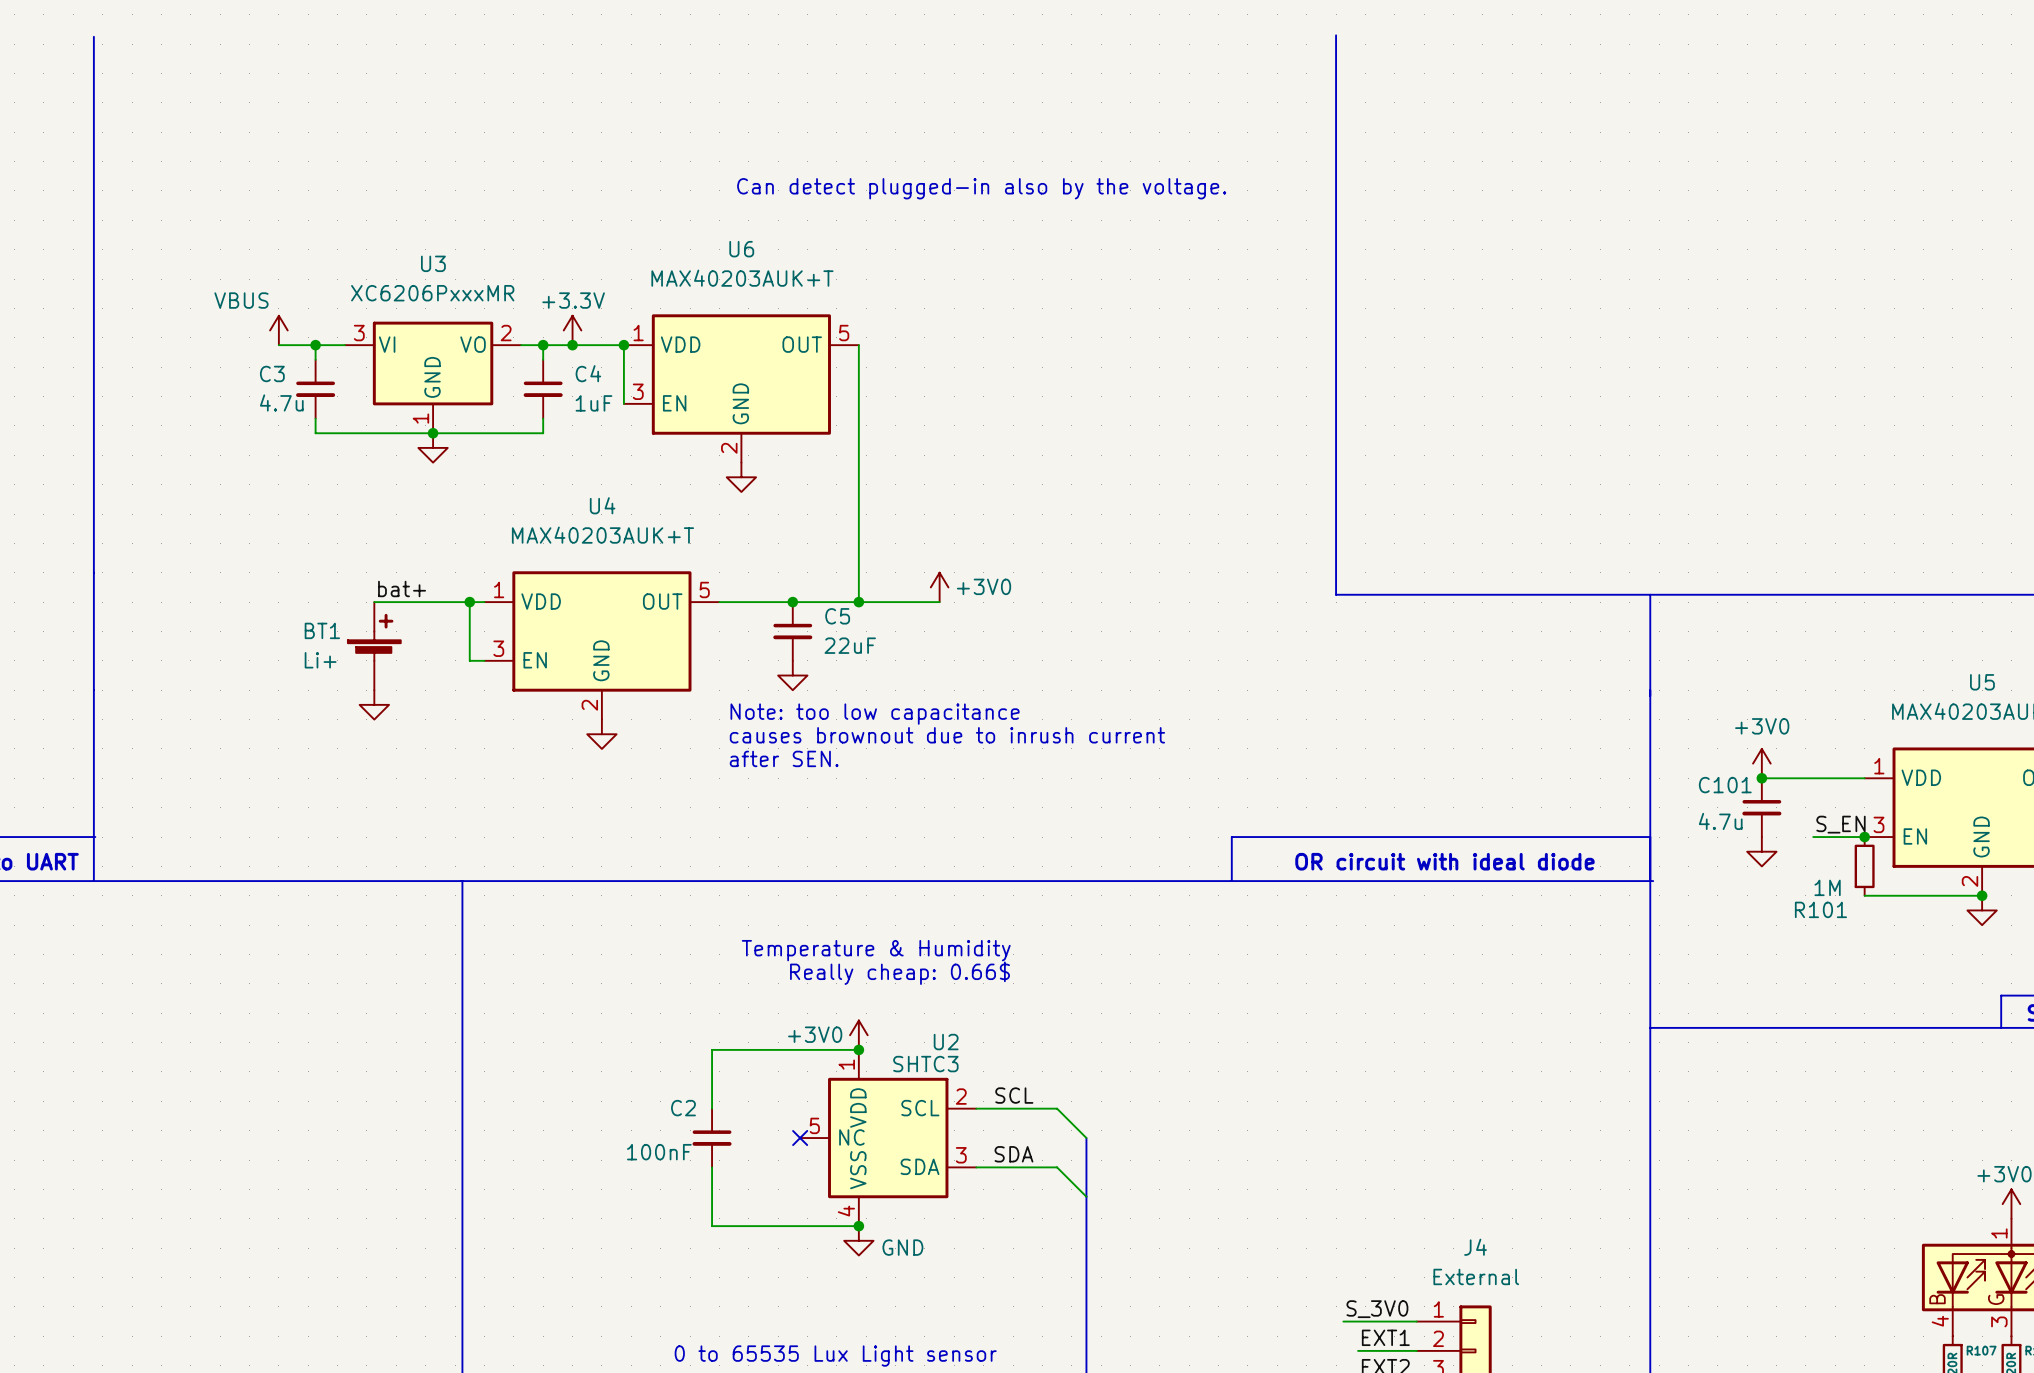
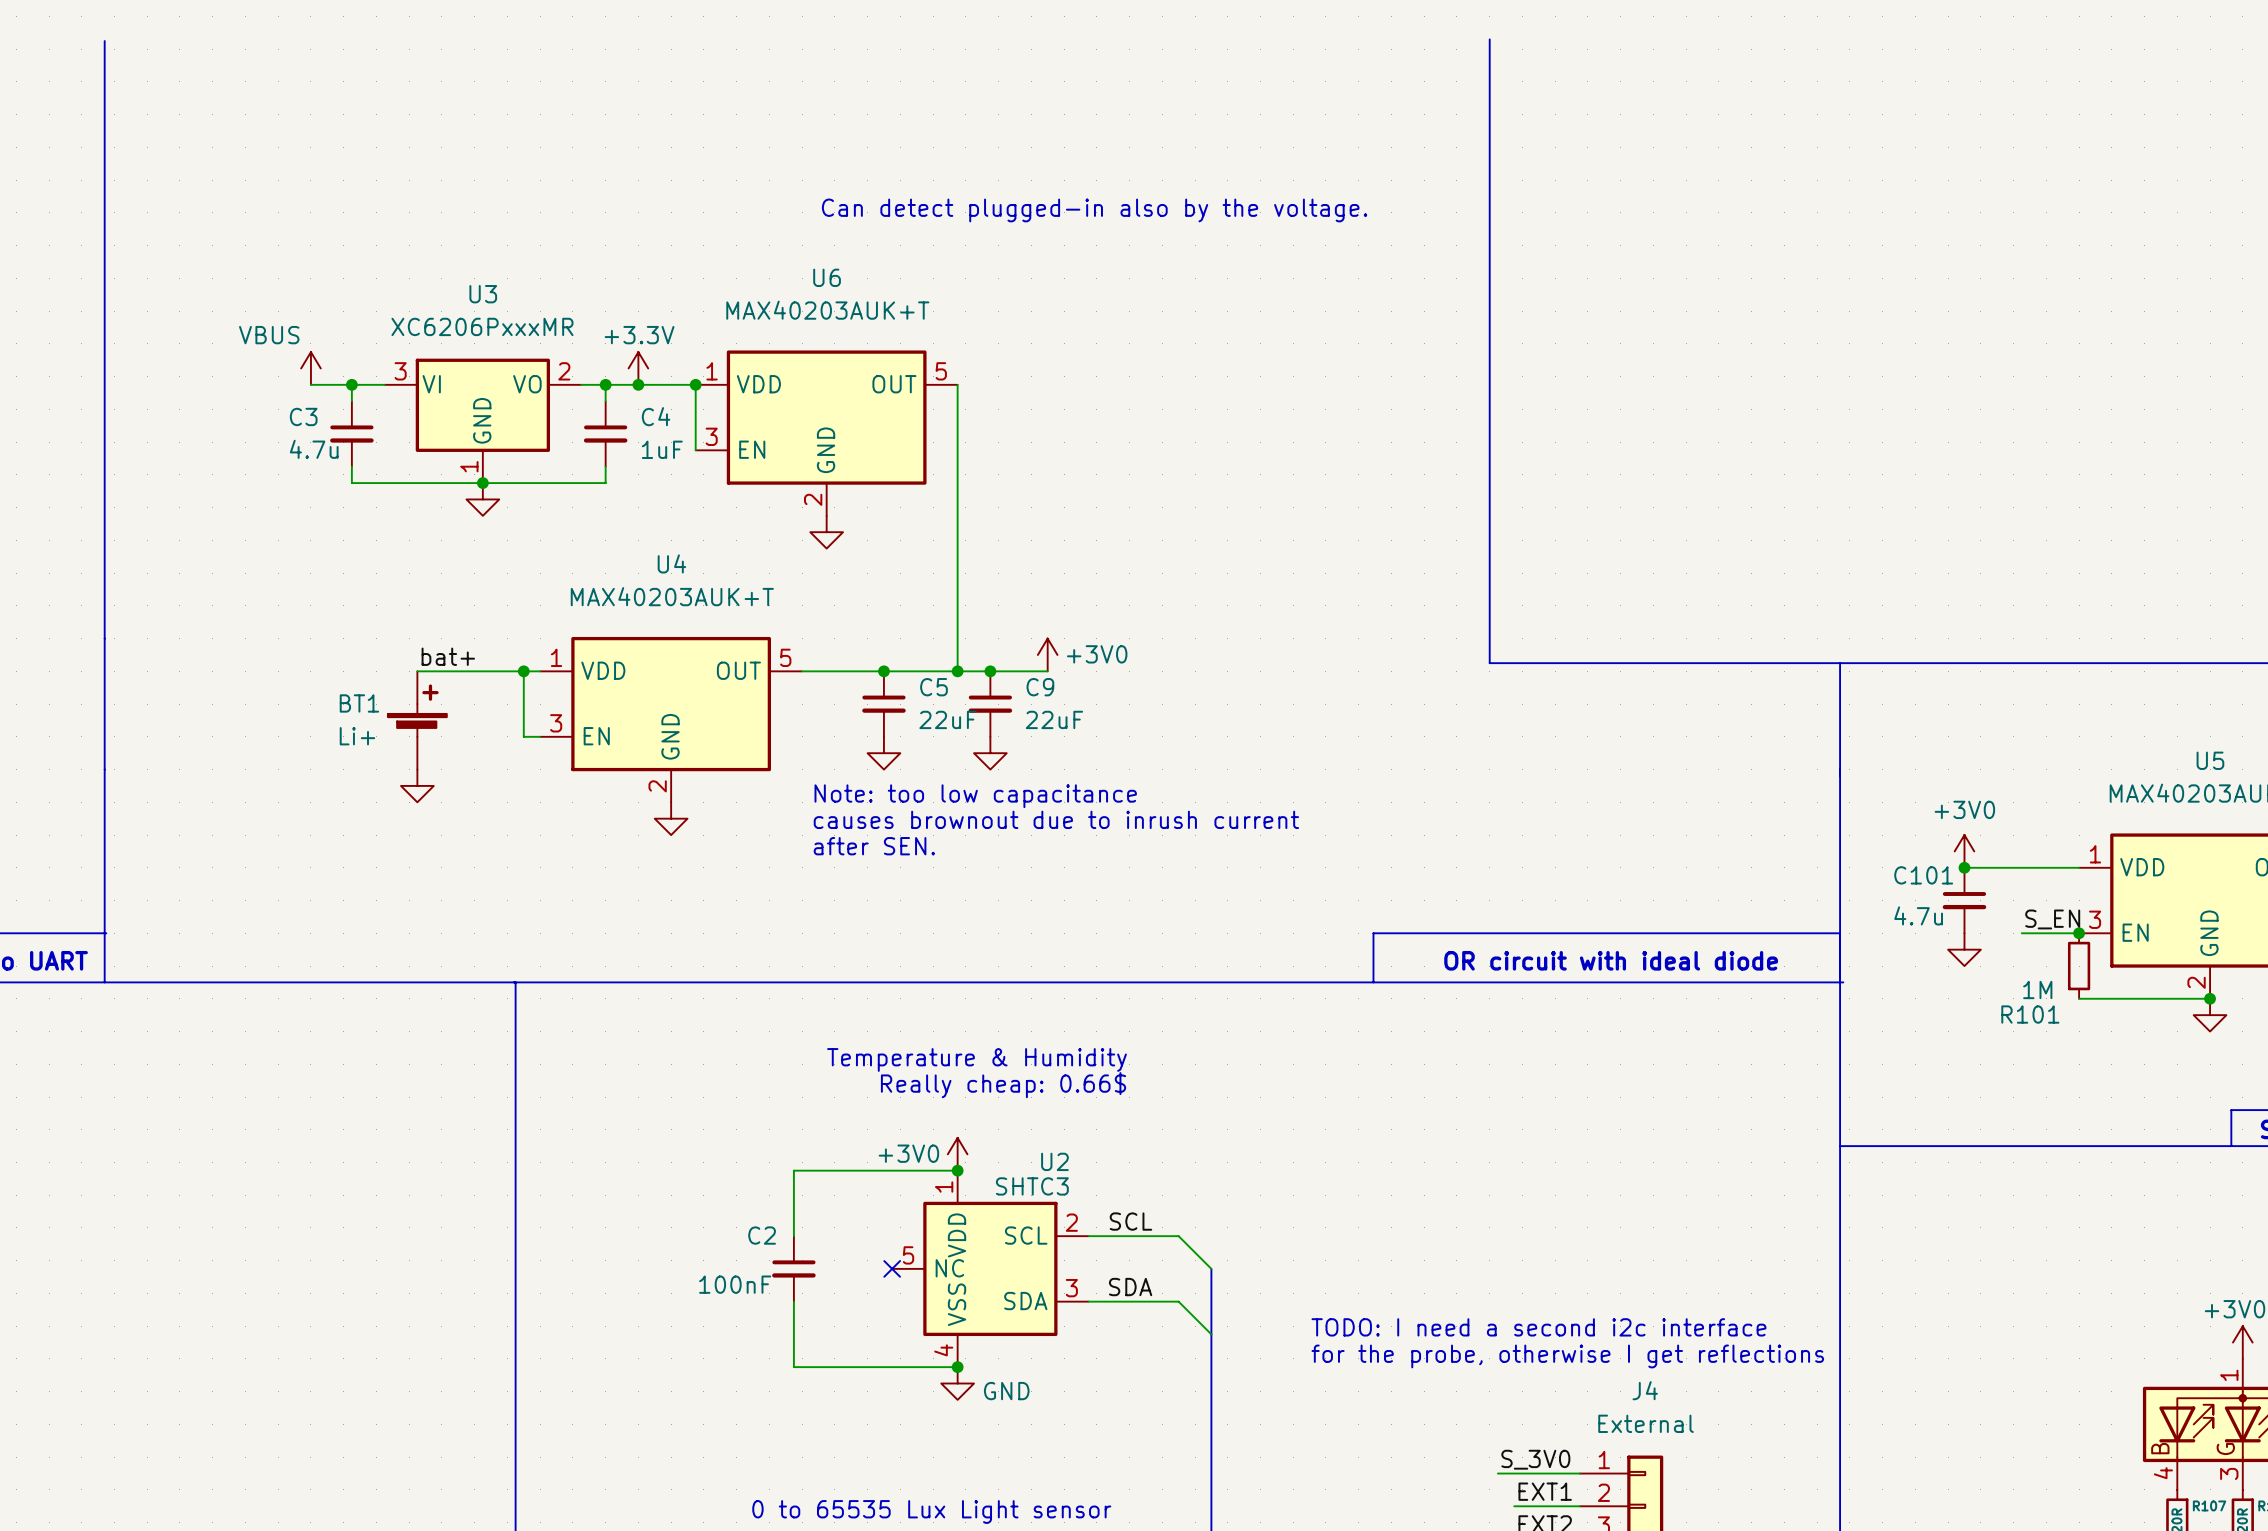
junction: none -> (990, 671)
C9: none -> 22uF (990, 704)
power symbol: none -> (990, 753)
text: none -> TODO: I need a second i2c interface (1538, 1327)
text: none -> for the probe, otherwise I get reflections (1567, 1356)

